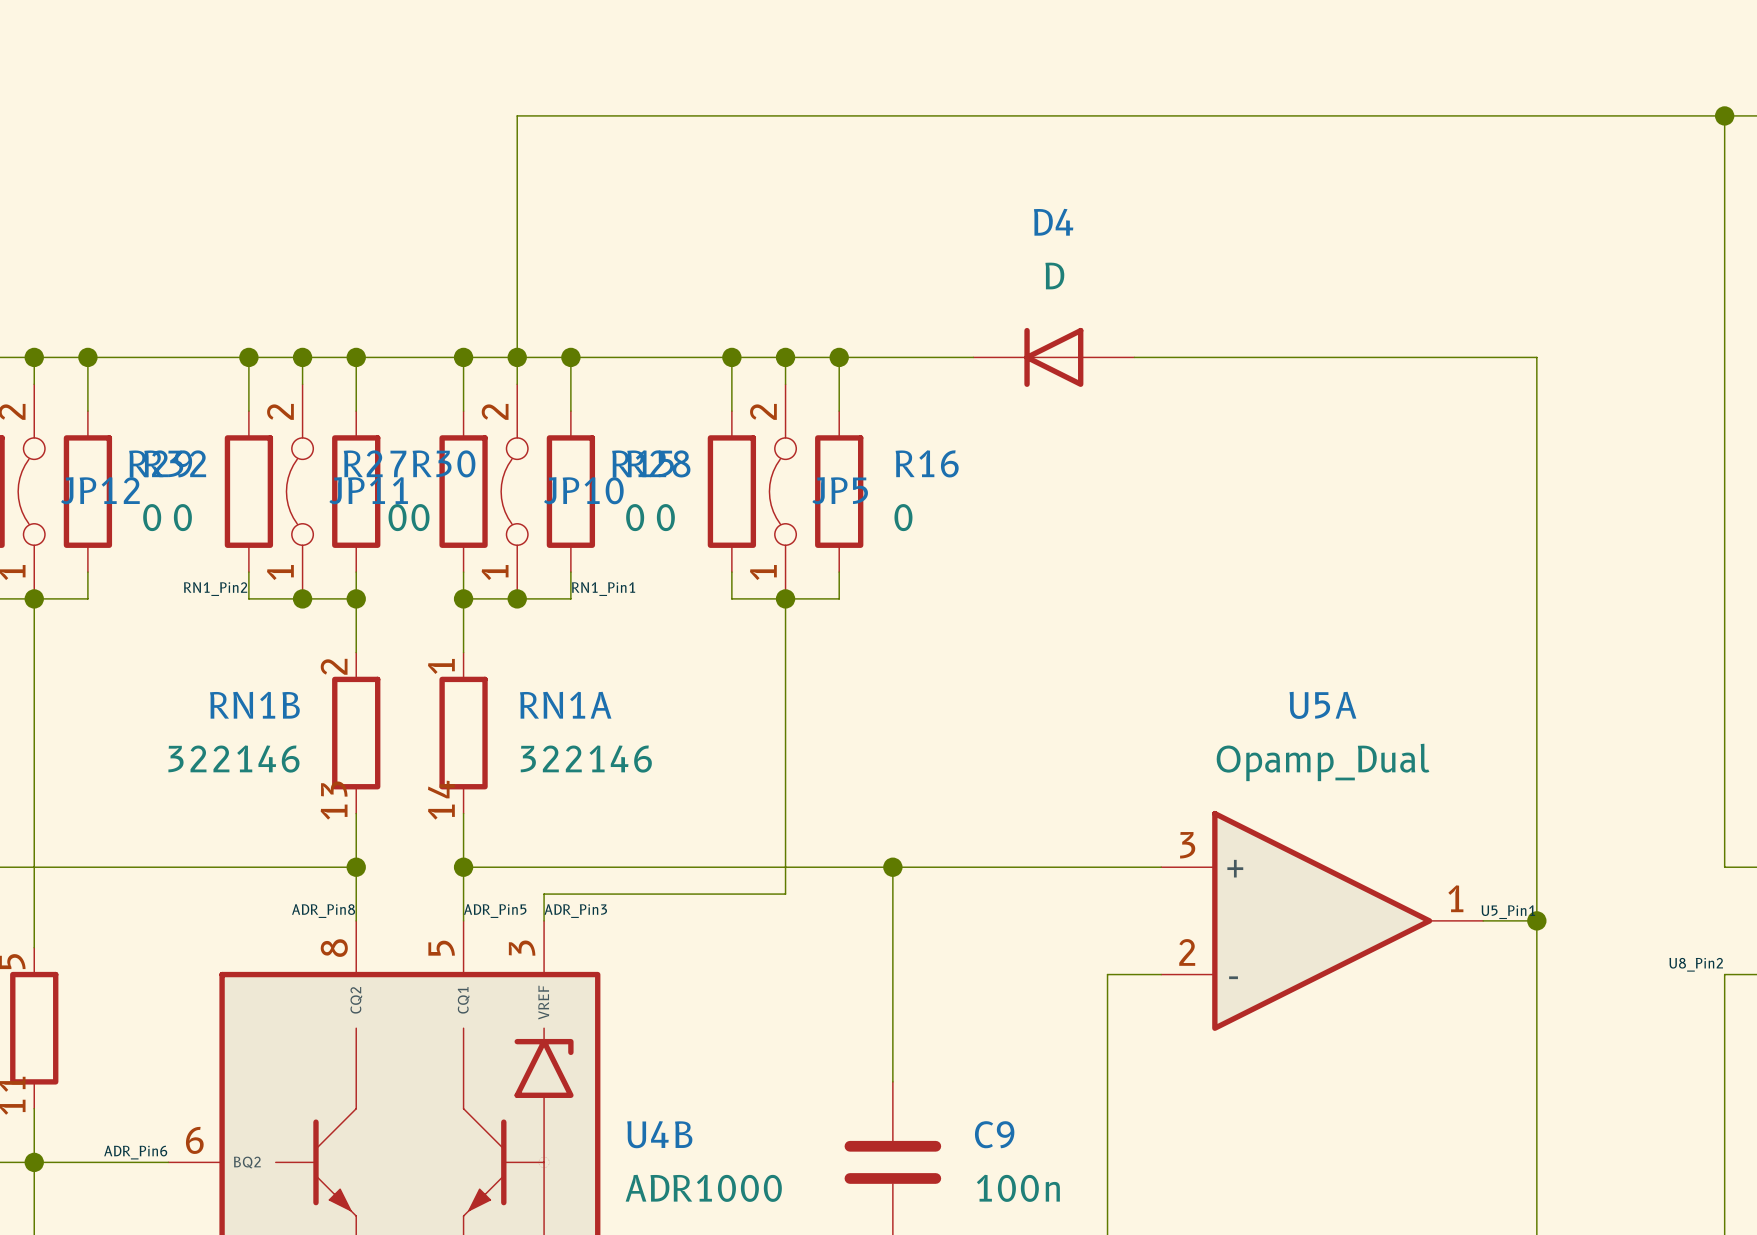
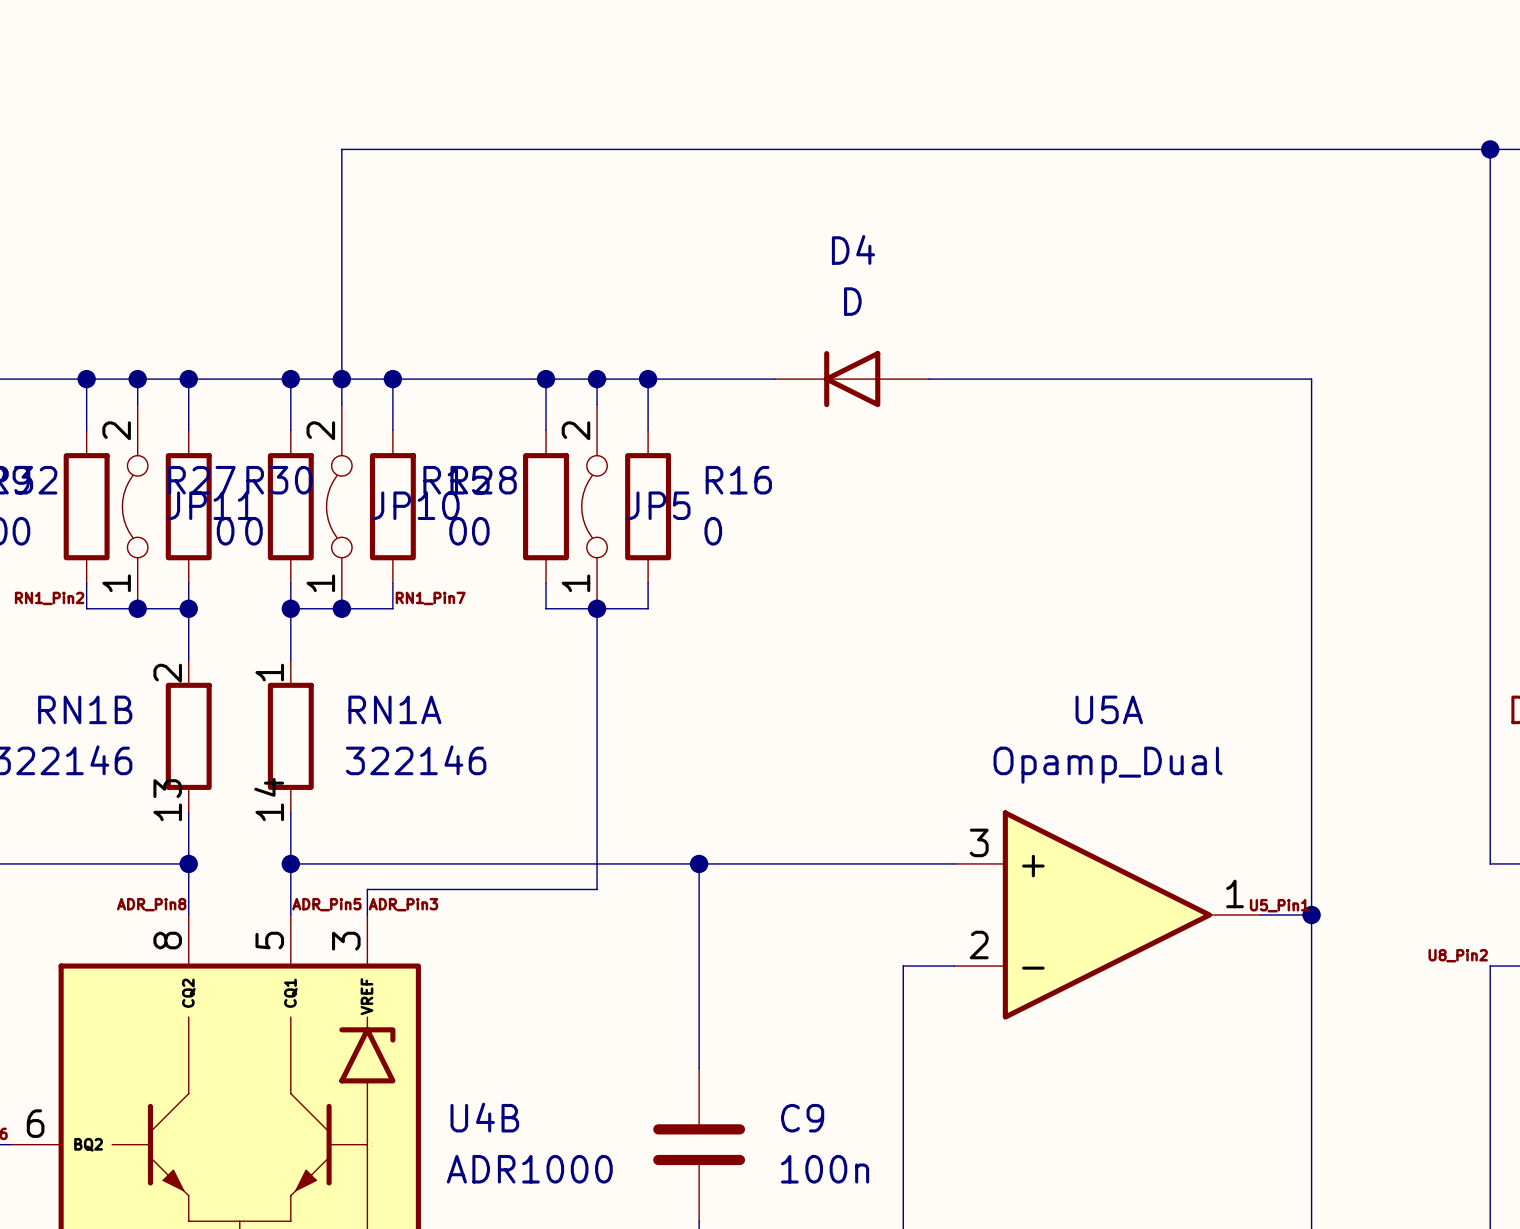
label: RN1_Pin1 (603, 589) -> RN1_Pin7 (430, 598)

